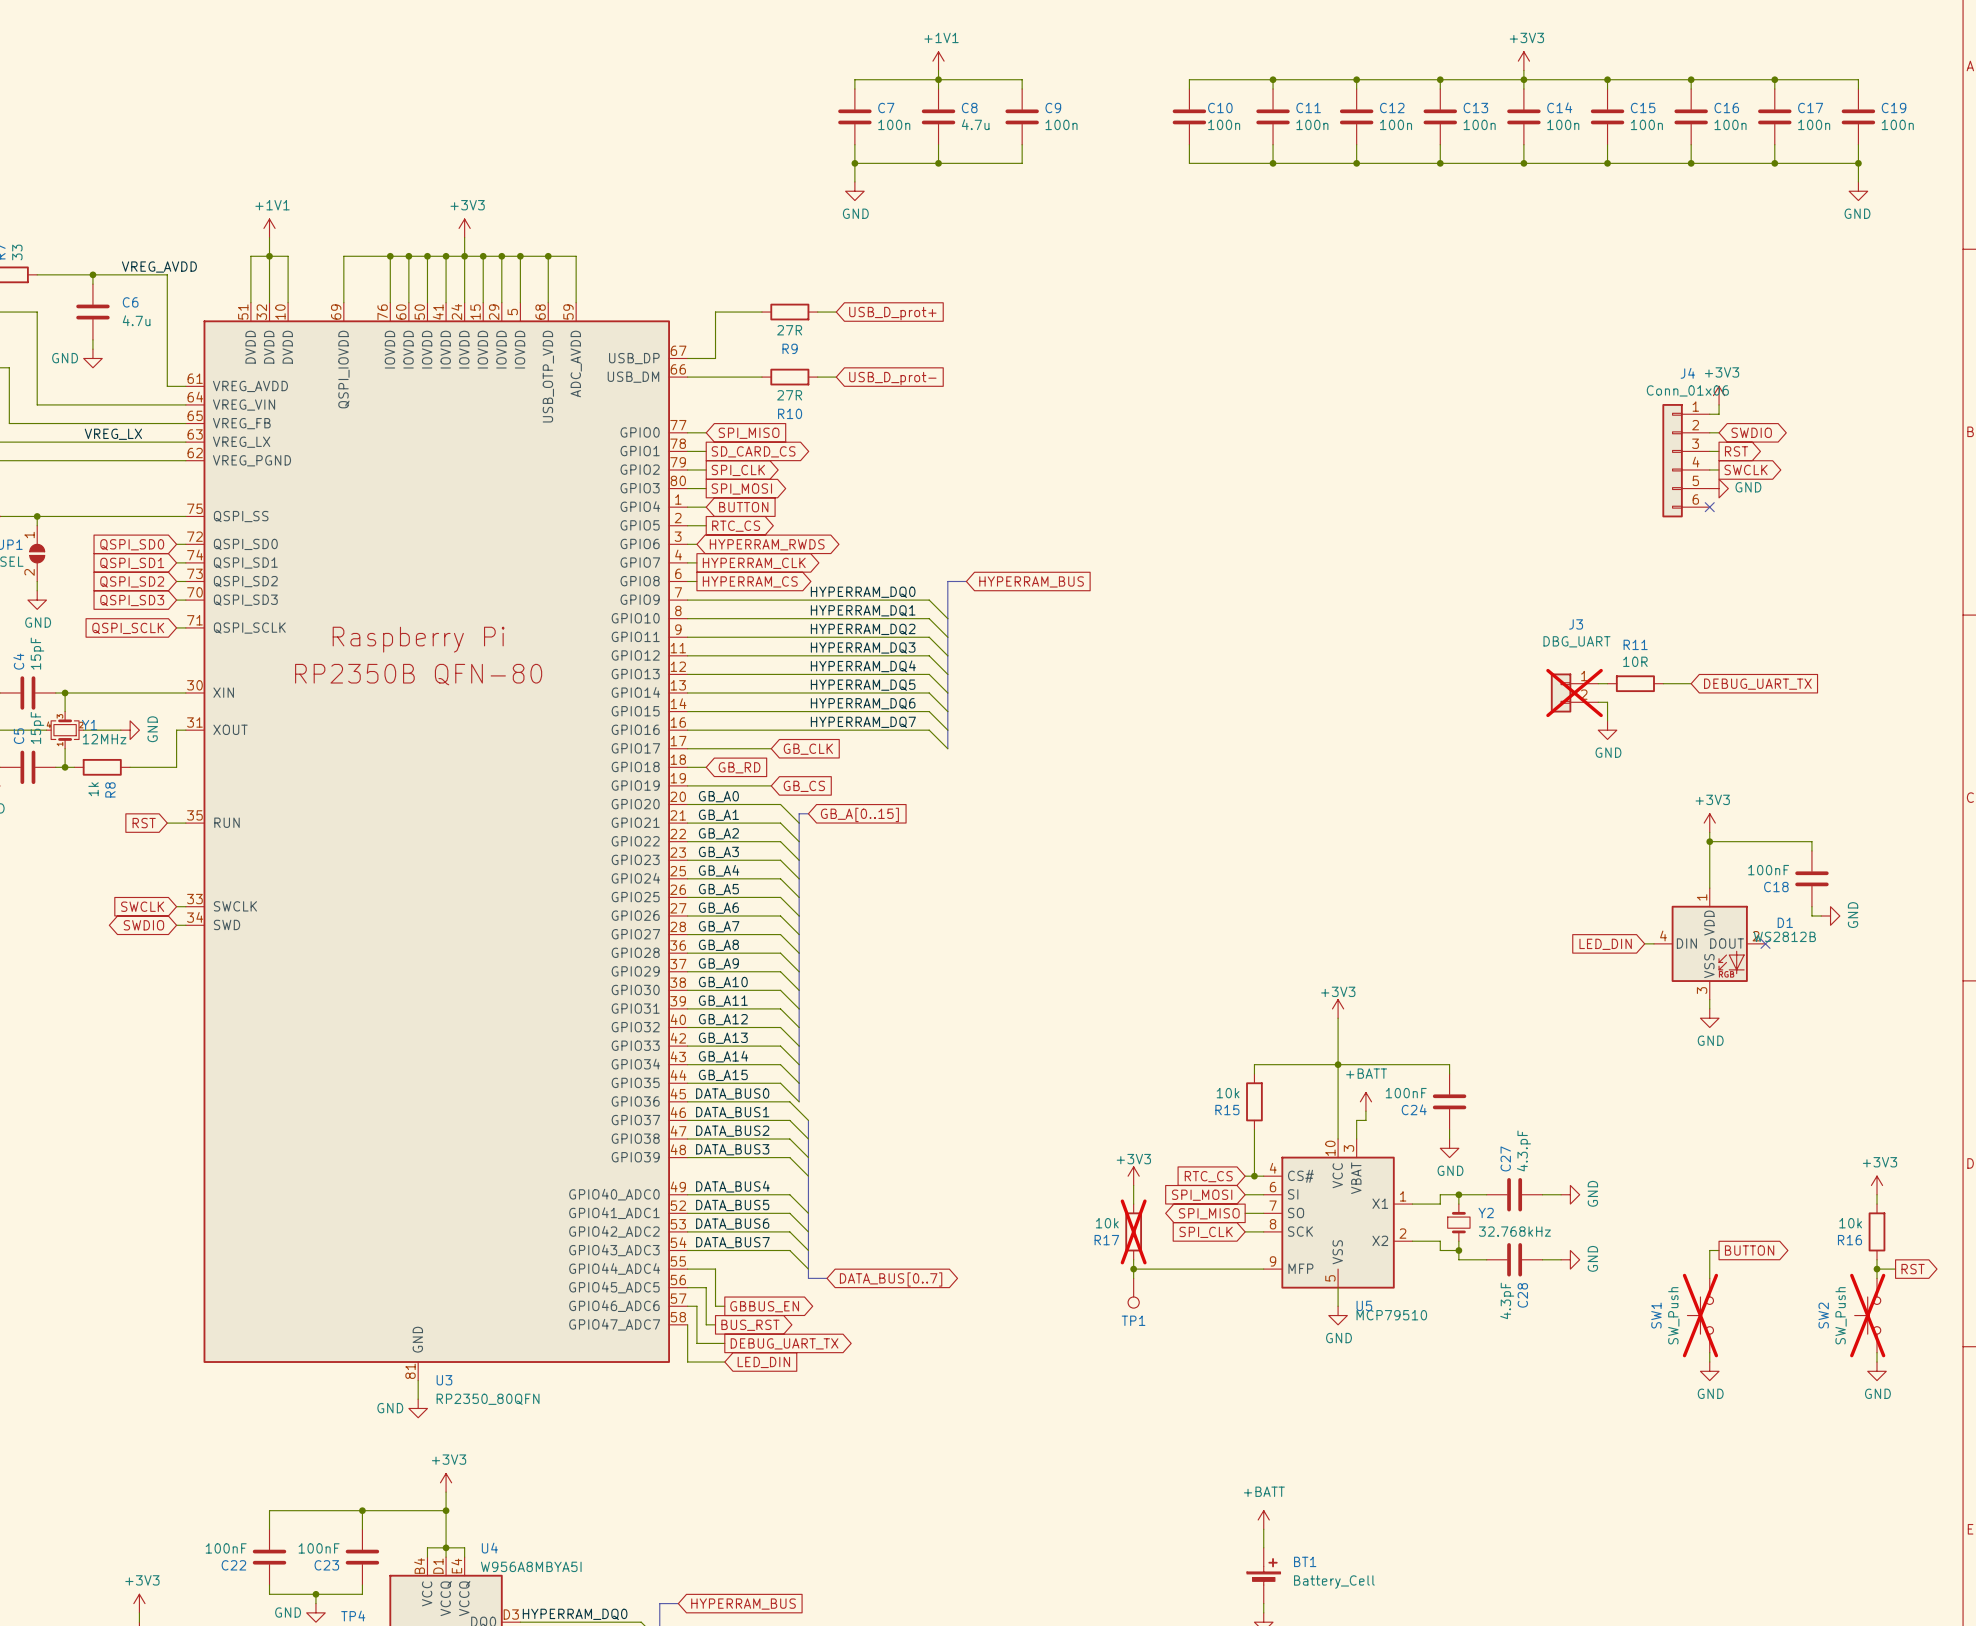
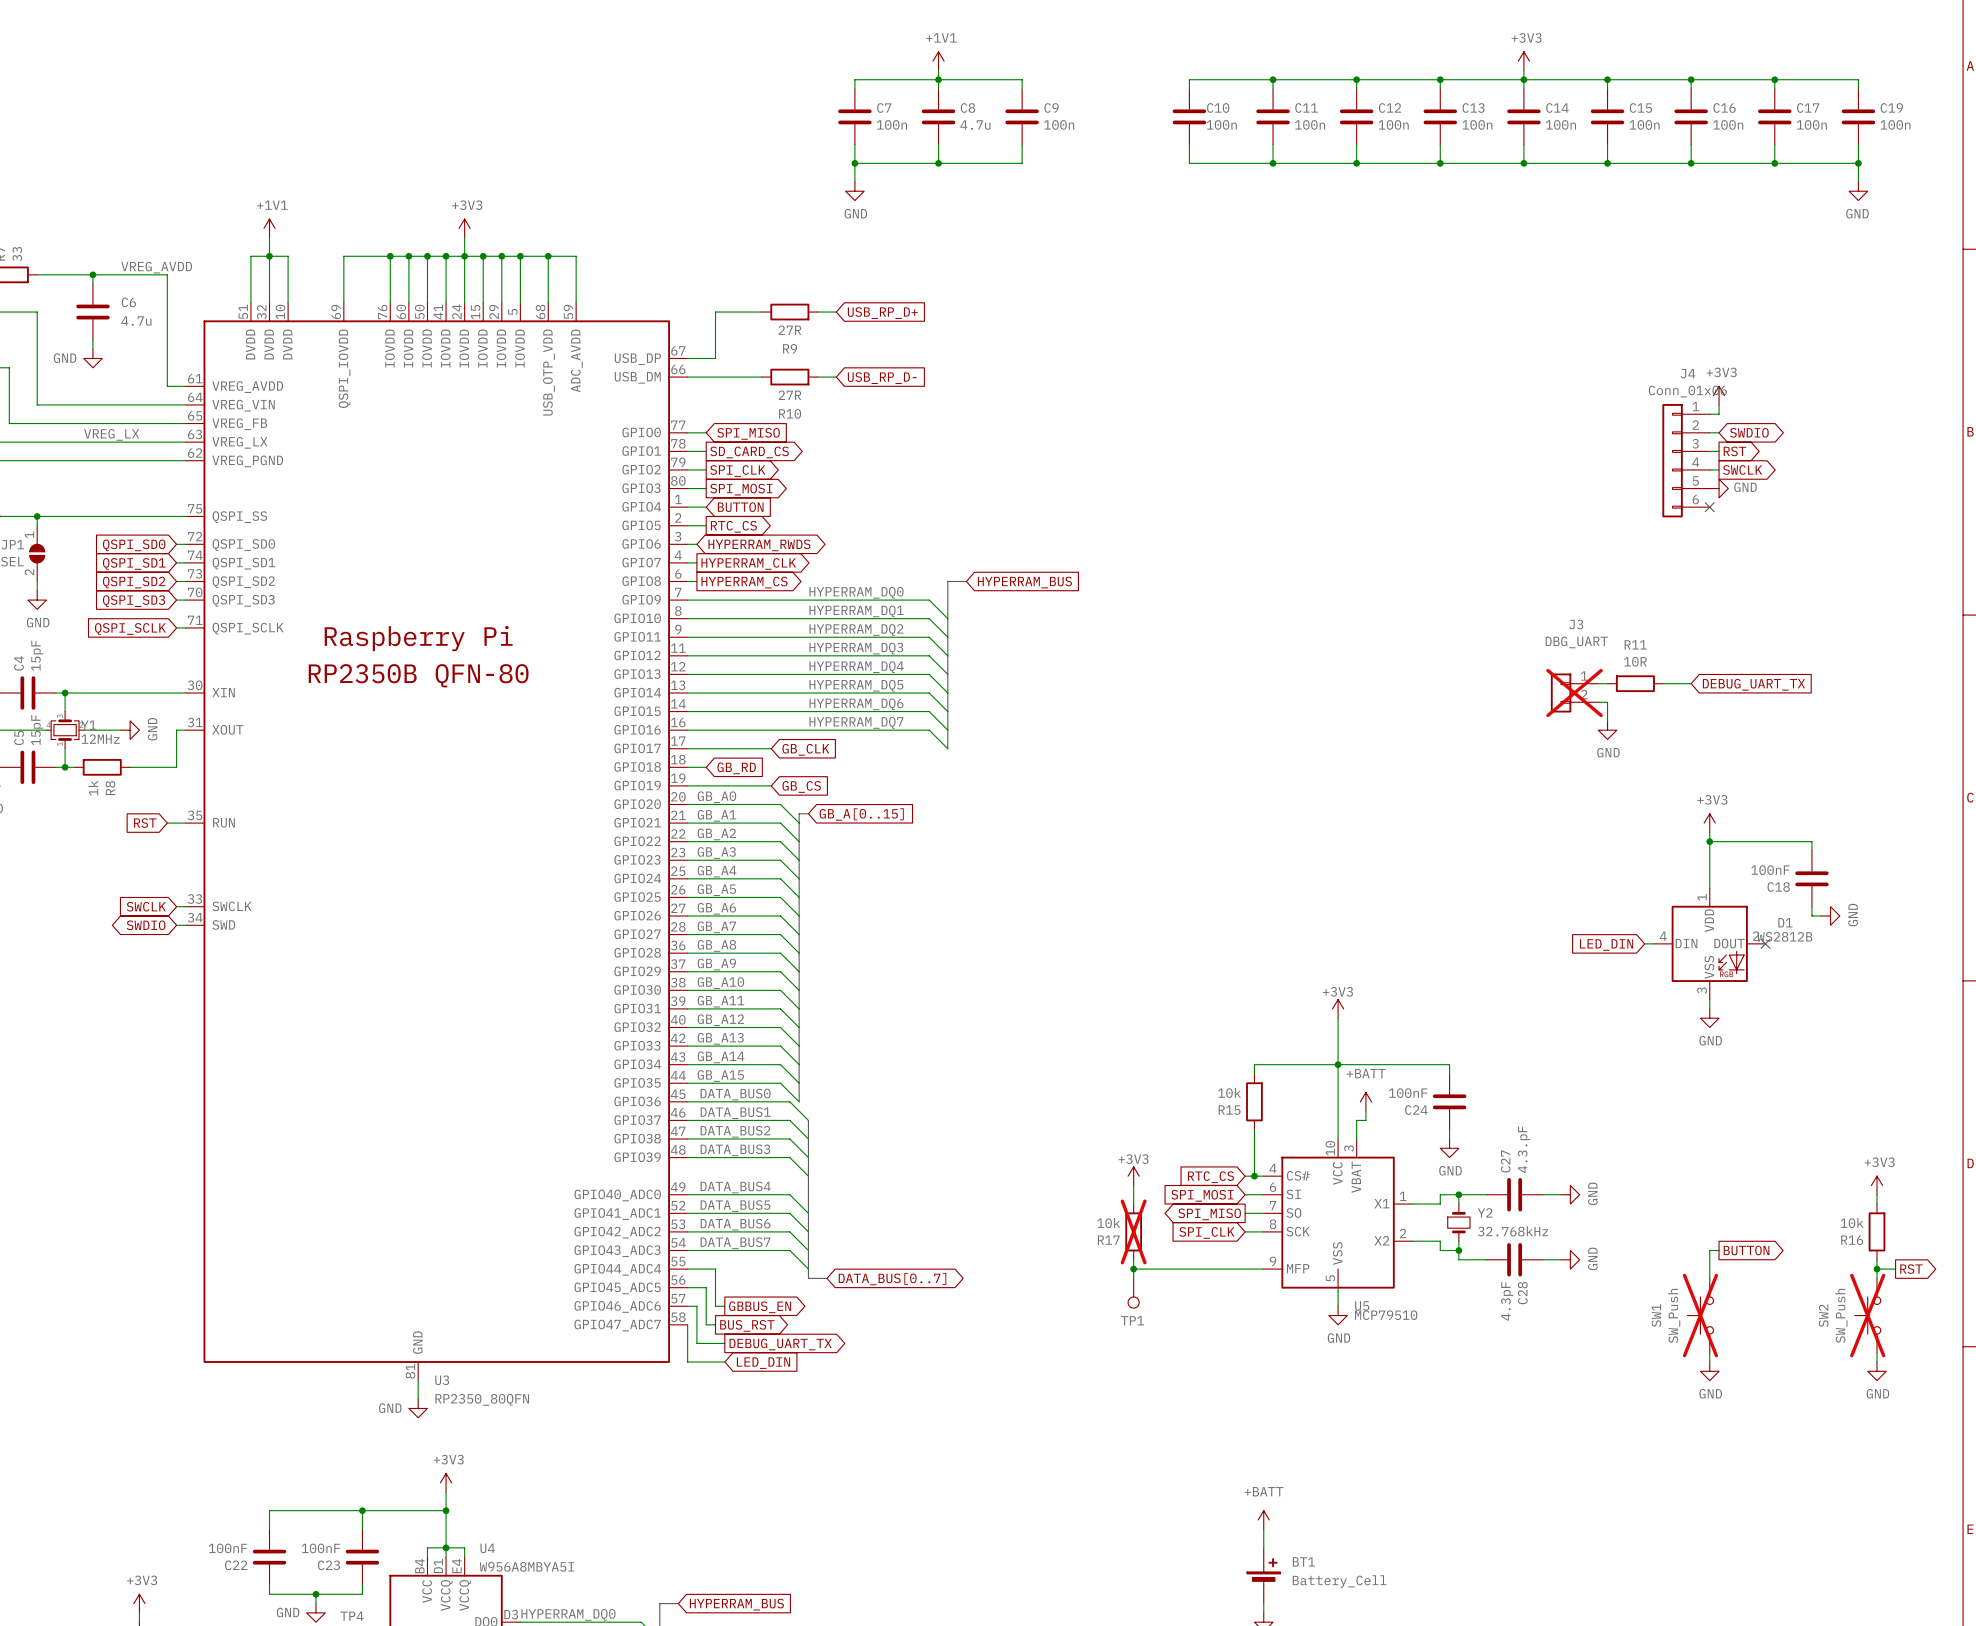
global label: USB_D_prot+ (892, 313) -> USB_RP_D+ (882, 313)
global label: USB_D_prot- (892, 378) -> USB_RP_D- (882, 378)

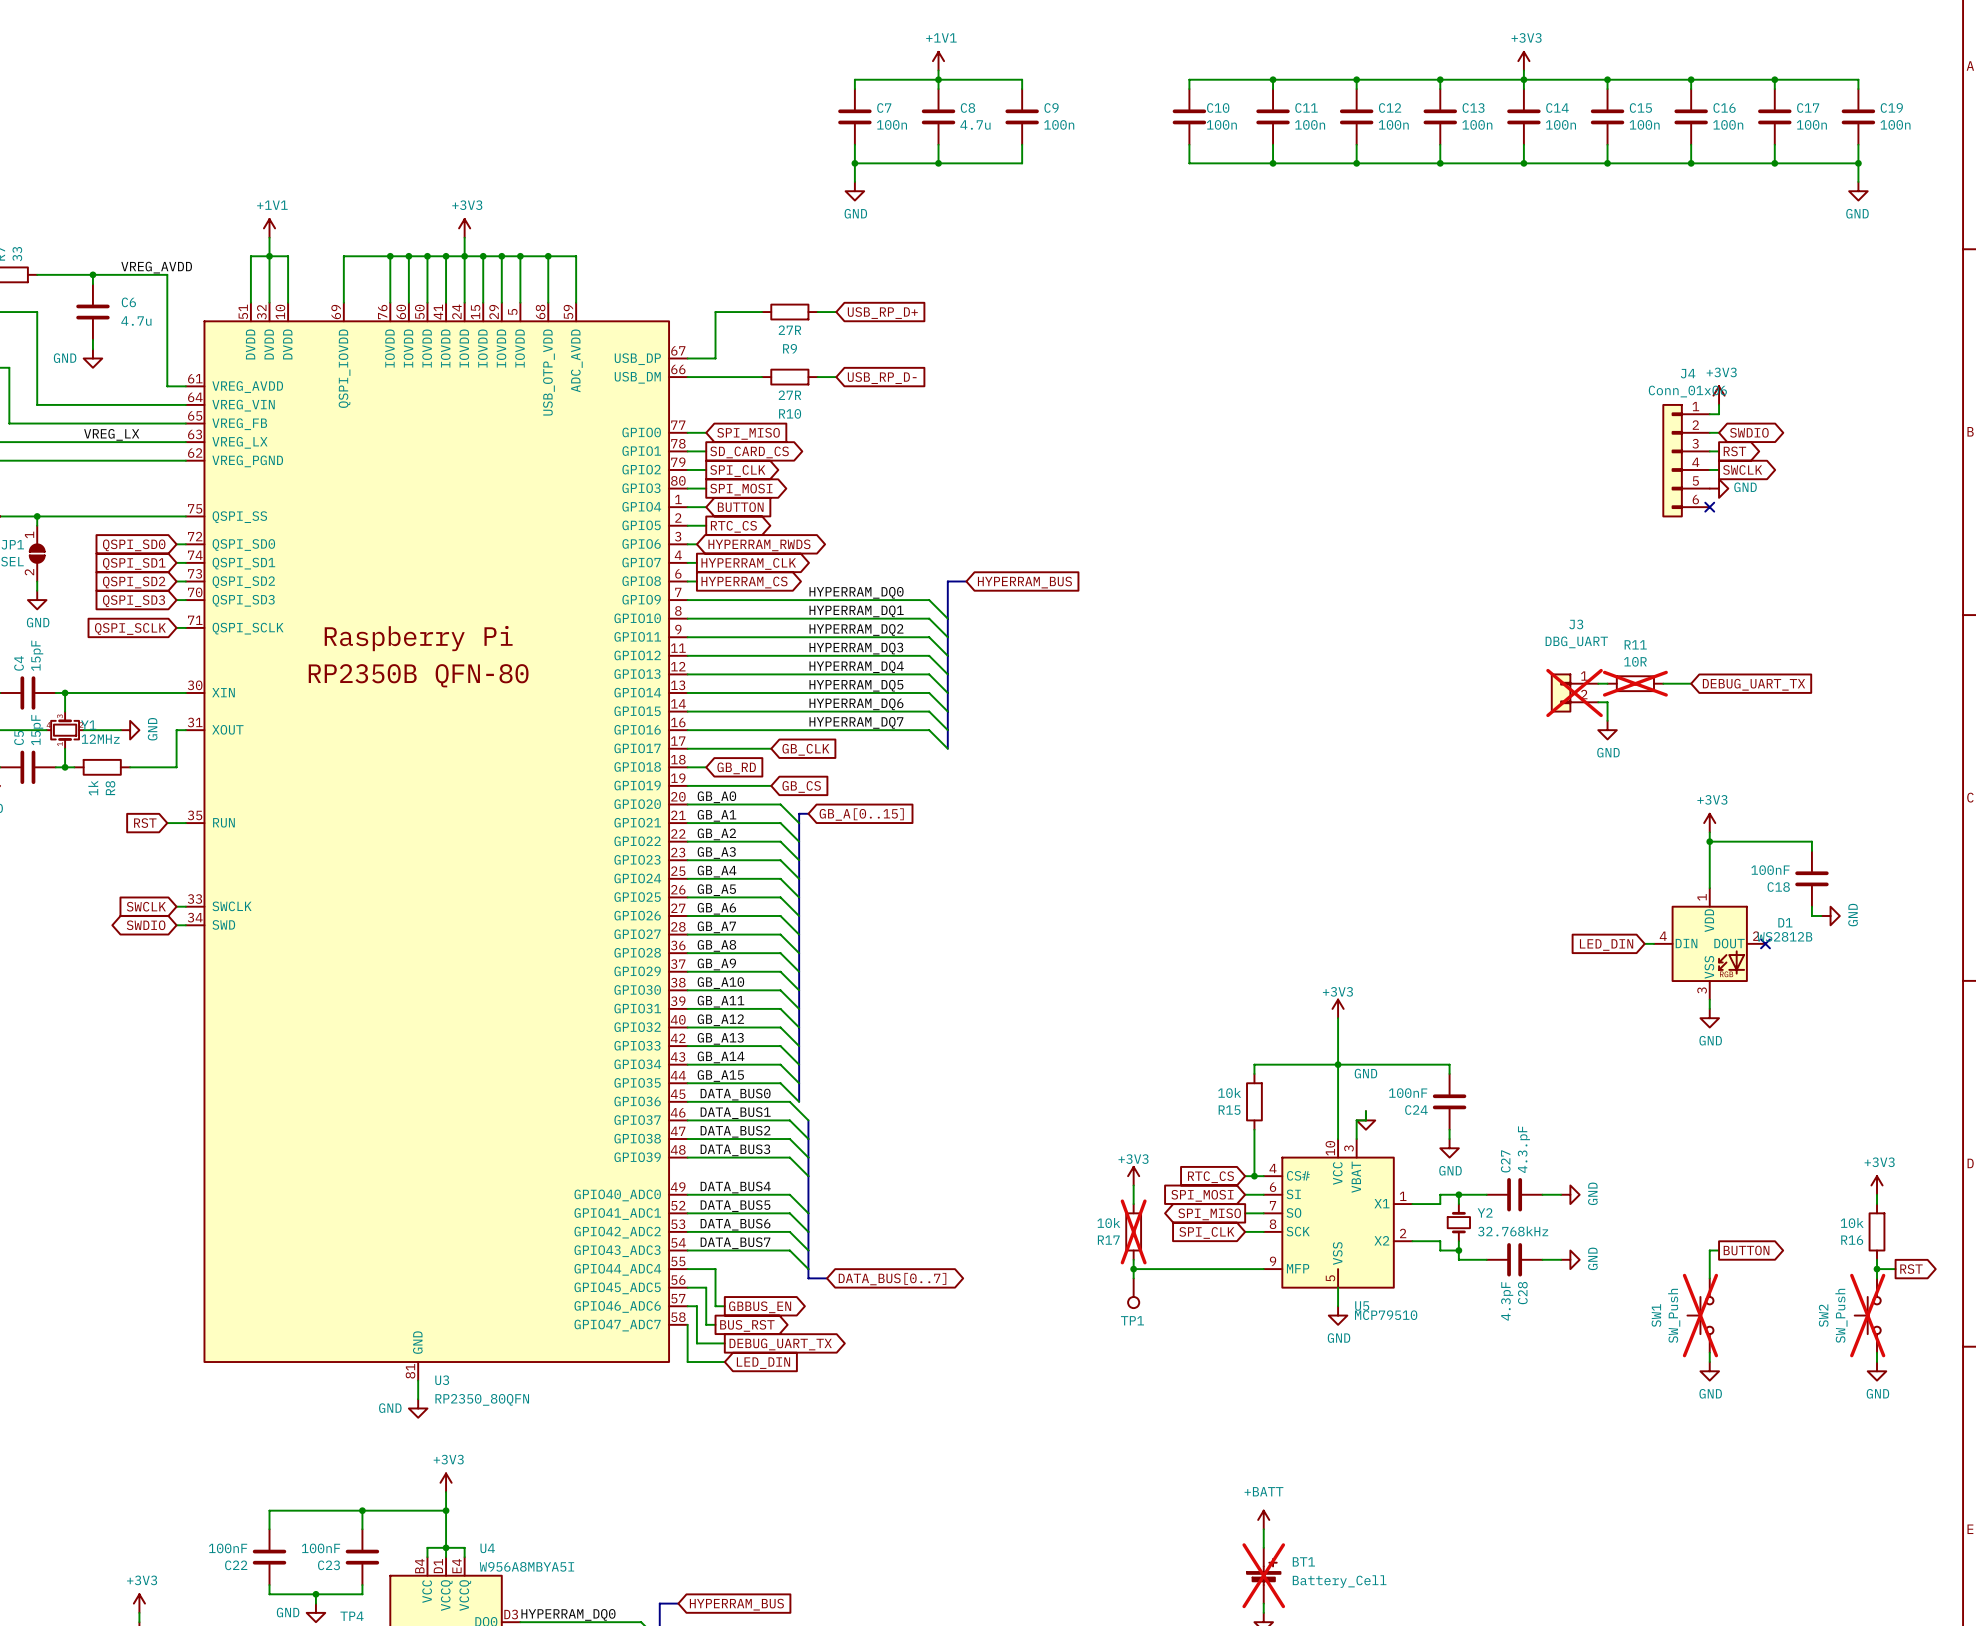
R11 do-not-place cross: none -> (1635, 683)
power symbol: +BATT (1365, 1101) -> none
power symbol: none -> GND (1365, 1120)
BT1 do-not-place cross: none -> (1263, 1575)

